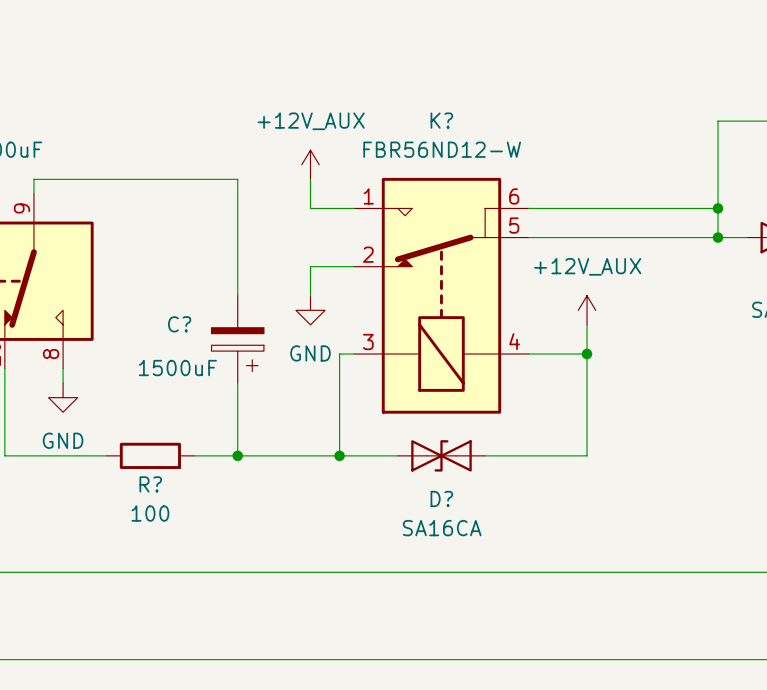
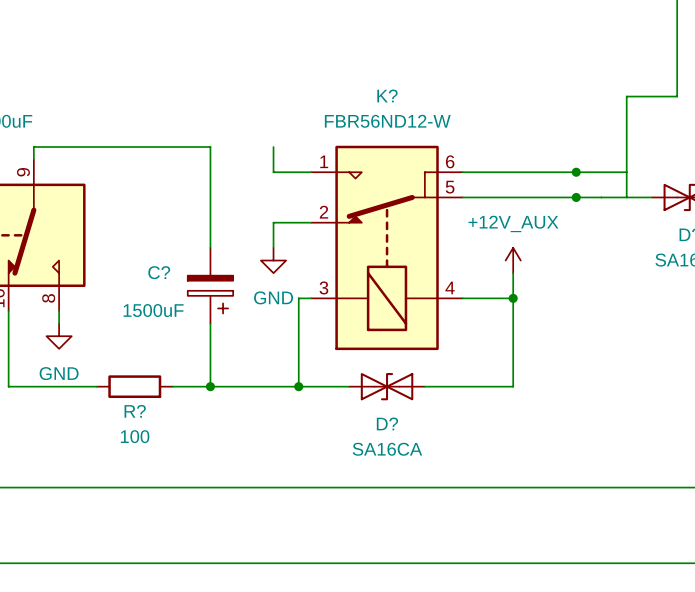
power symbol: +12V_AUX (310, 164) -> none
junction: none -> (576, 172)
junction: (718, 208) -> none
junction: none -> (576, 197)
junction: (718, 237) -> none

